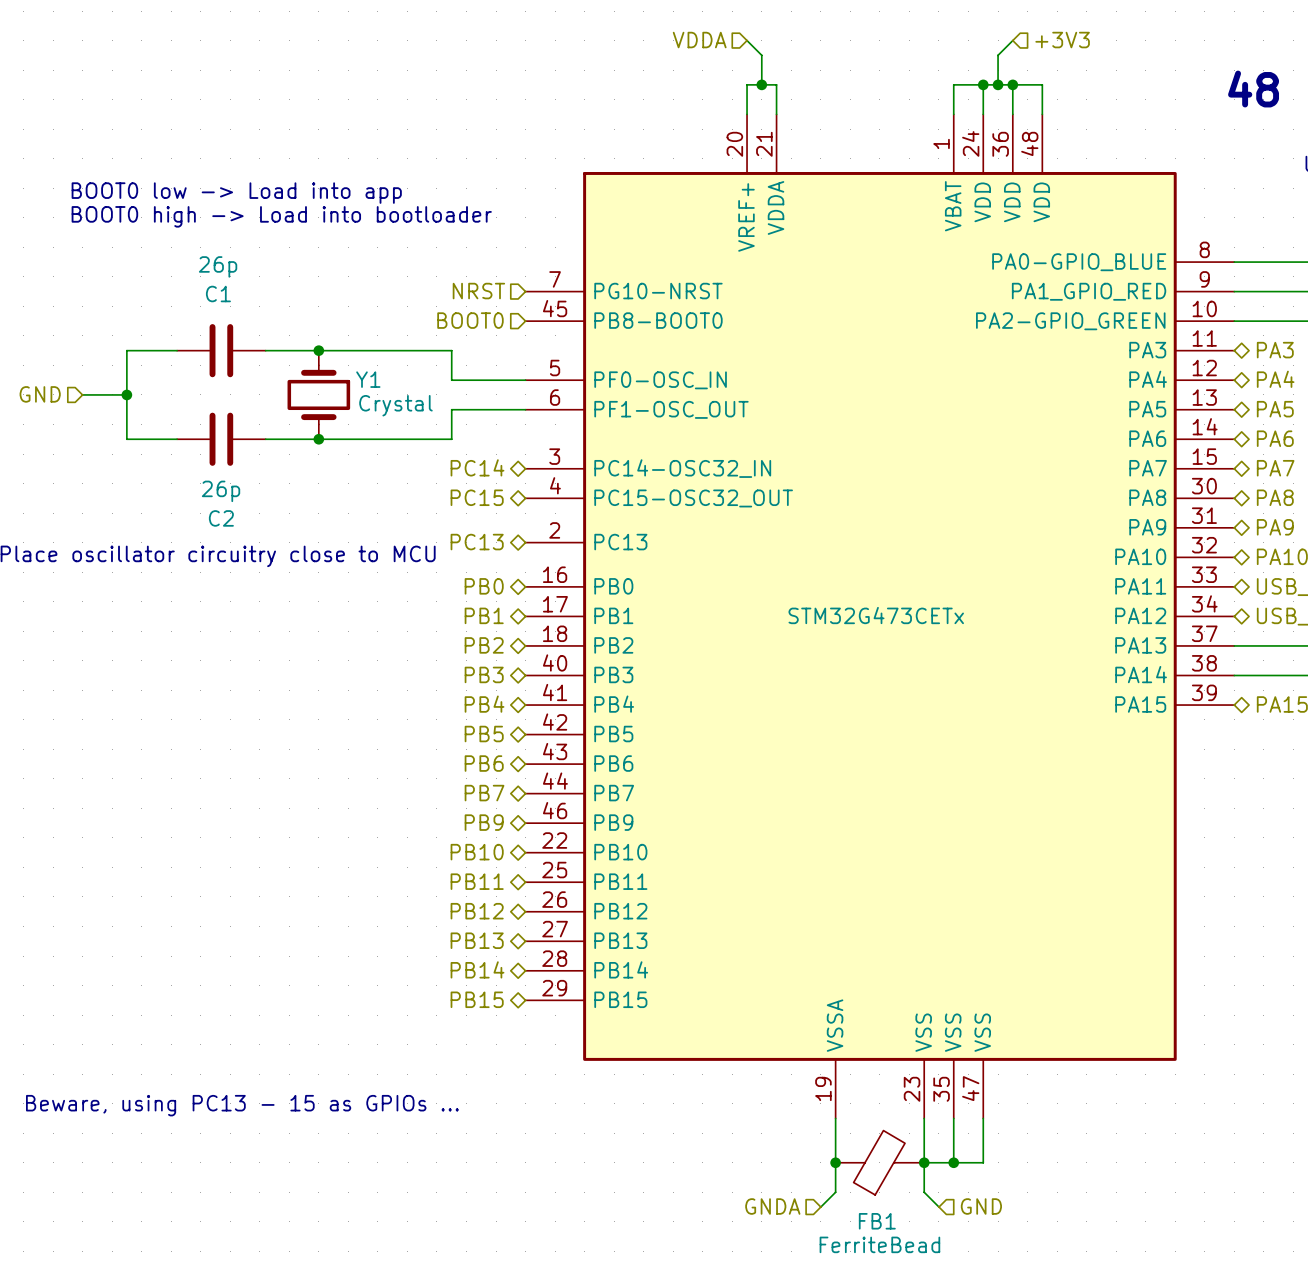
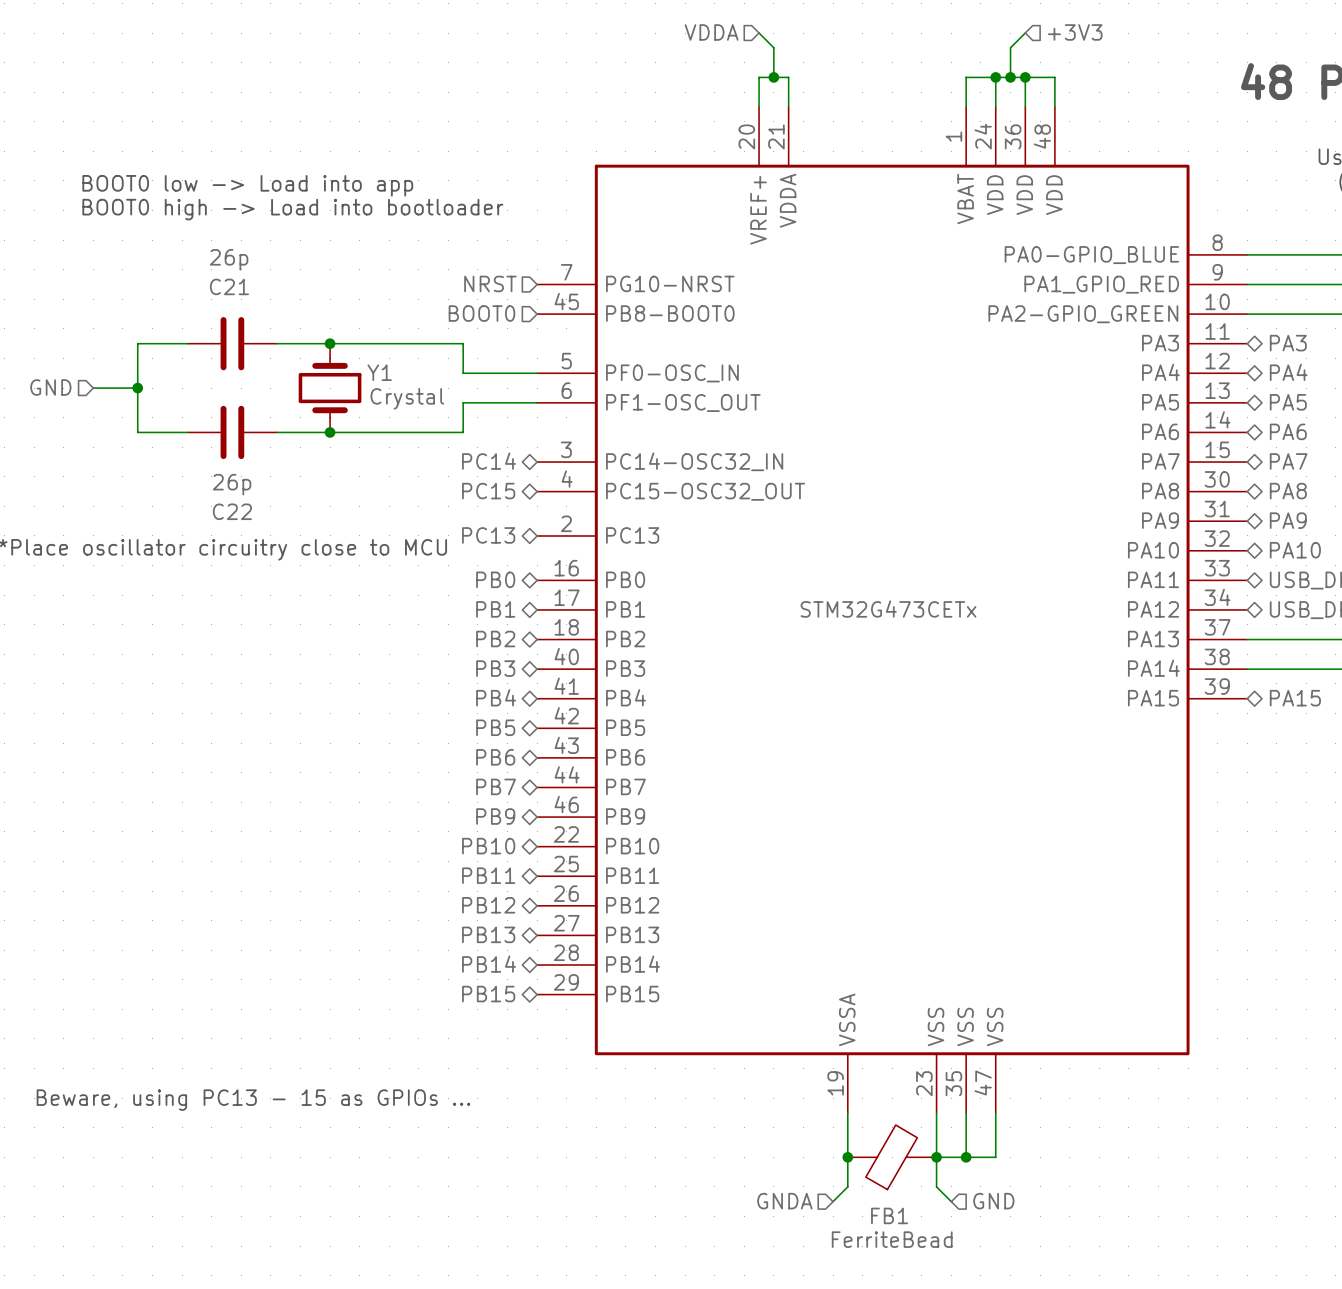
C1 name: C1 (218, 294) -> C21 (229, 286)
C2 name: C2 (221, 518) -> C22 (232, 511)

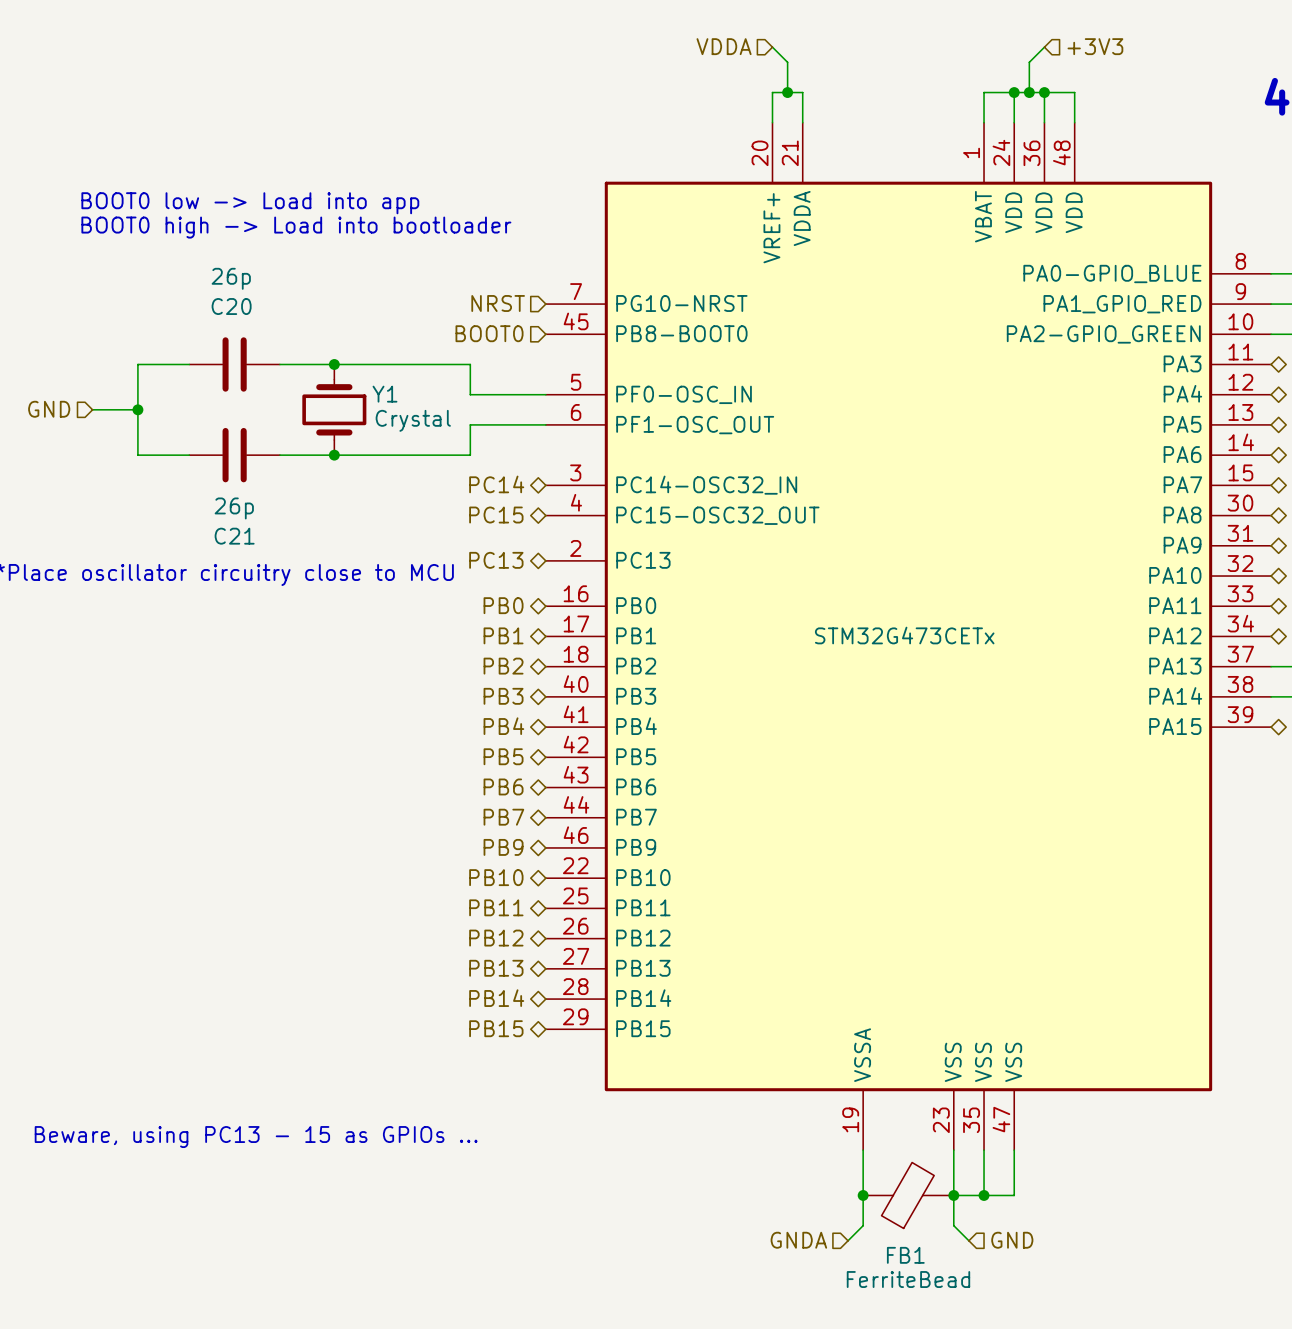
C21 name: C21 (229, 286) -> C20 (231, 306)
C22 name: C22 (232, 511) -> C21 (234, 536)

